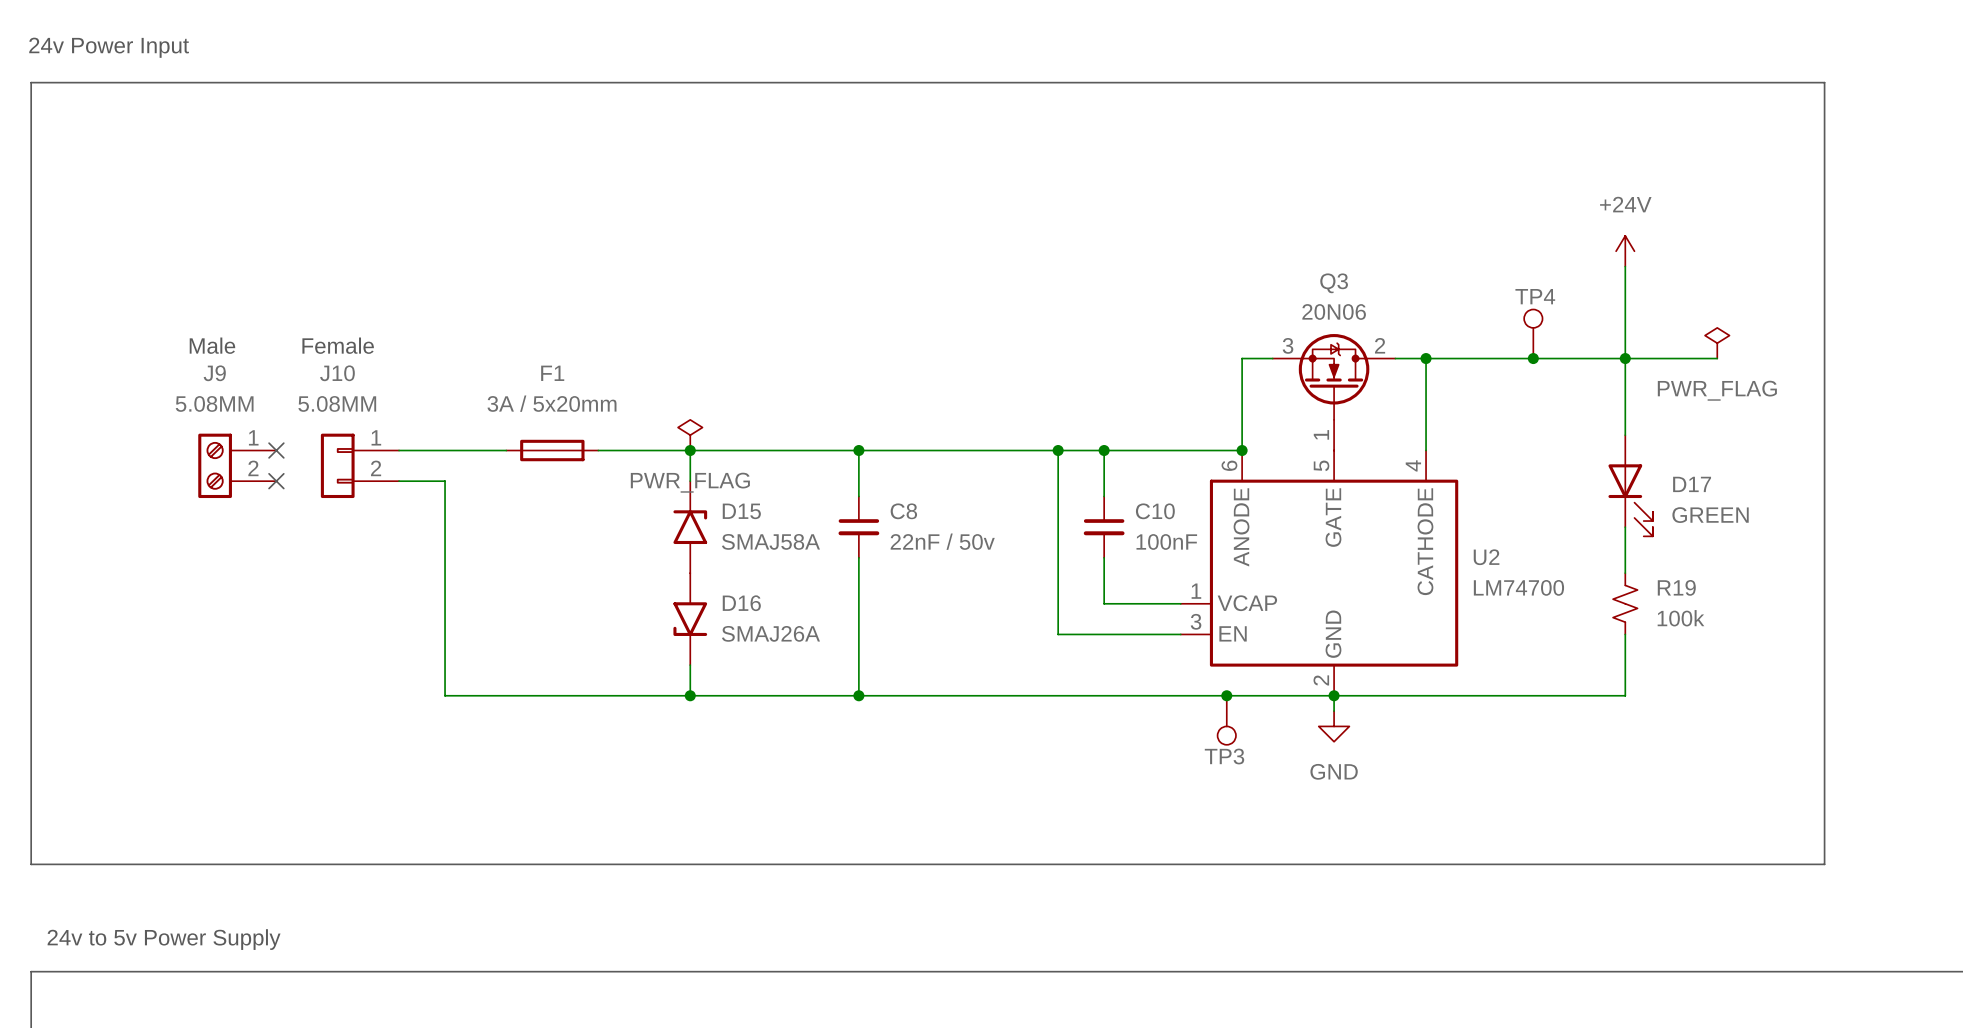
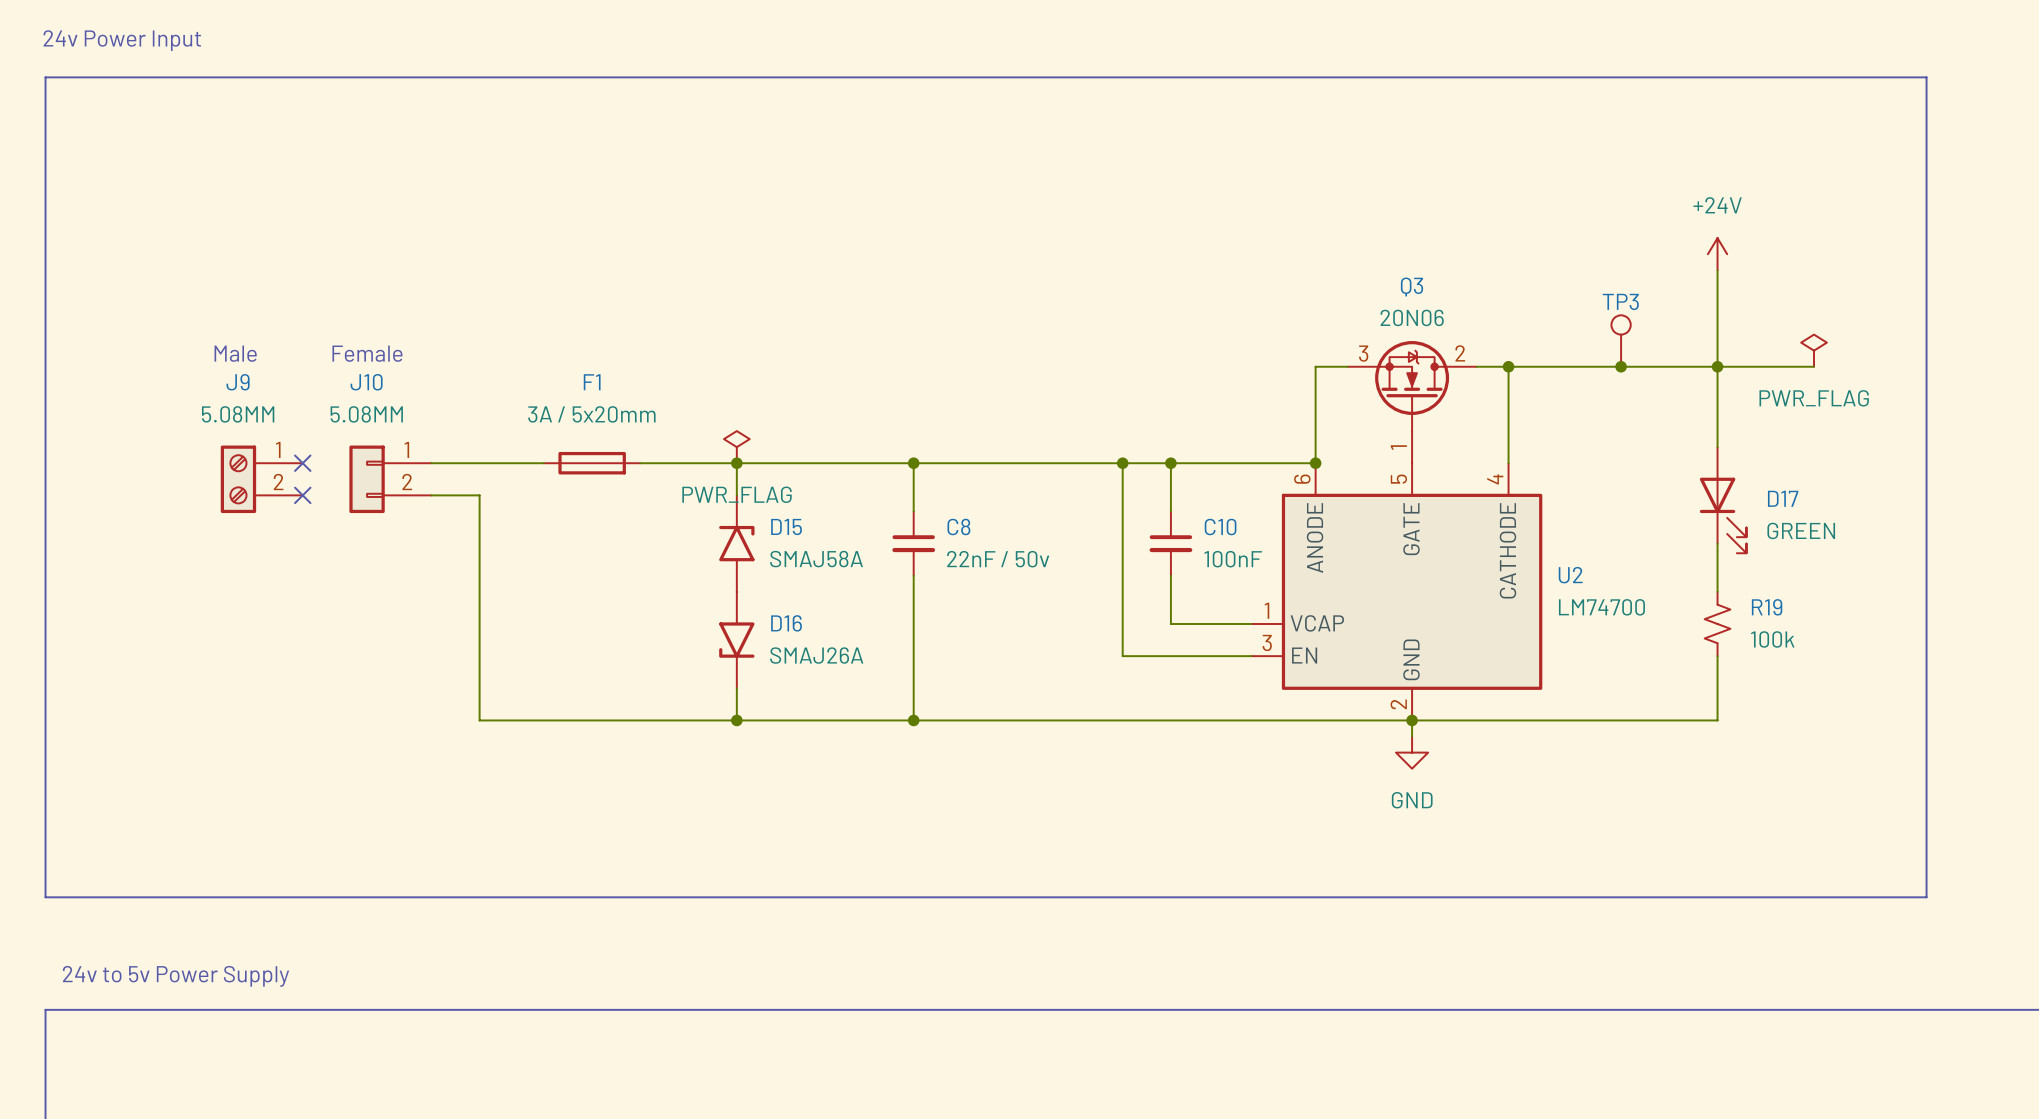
TP4 name: TP4 (1535, 296) -> TP3 (1620, 301)
junction: (1226, 695) -> none
TP3: (1226, 720) -> none

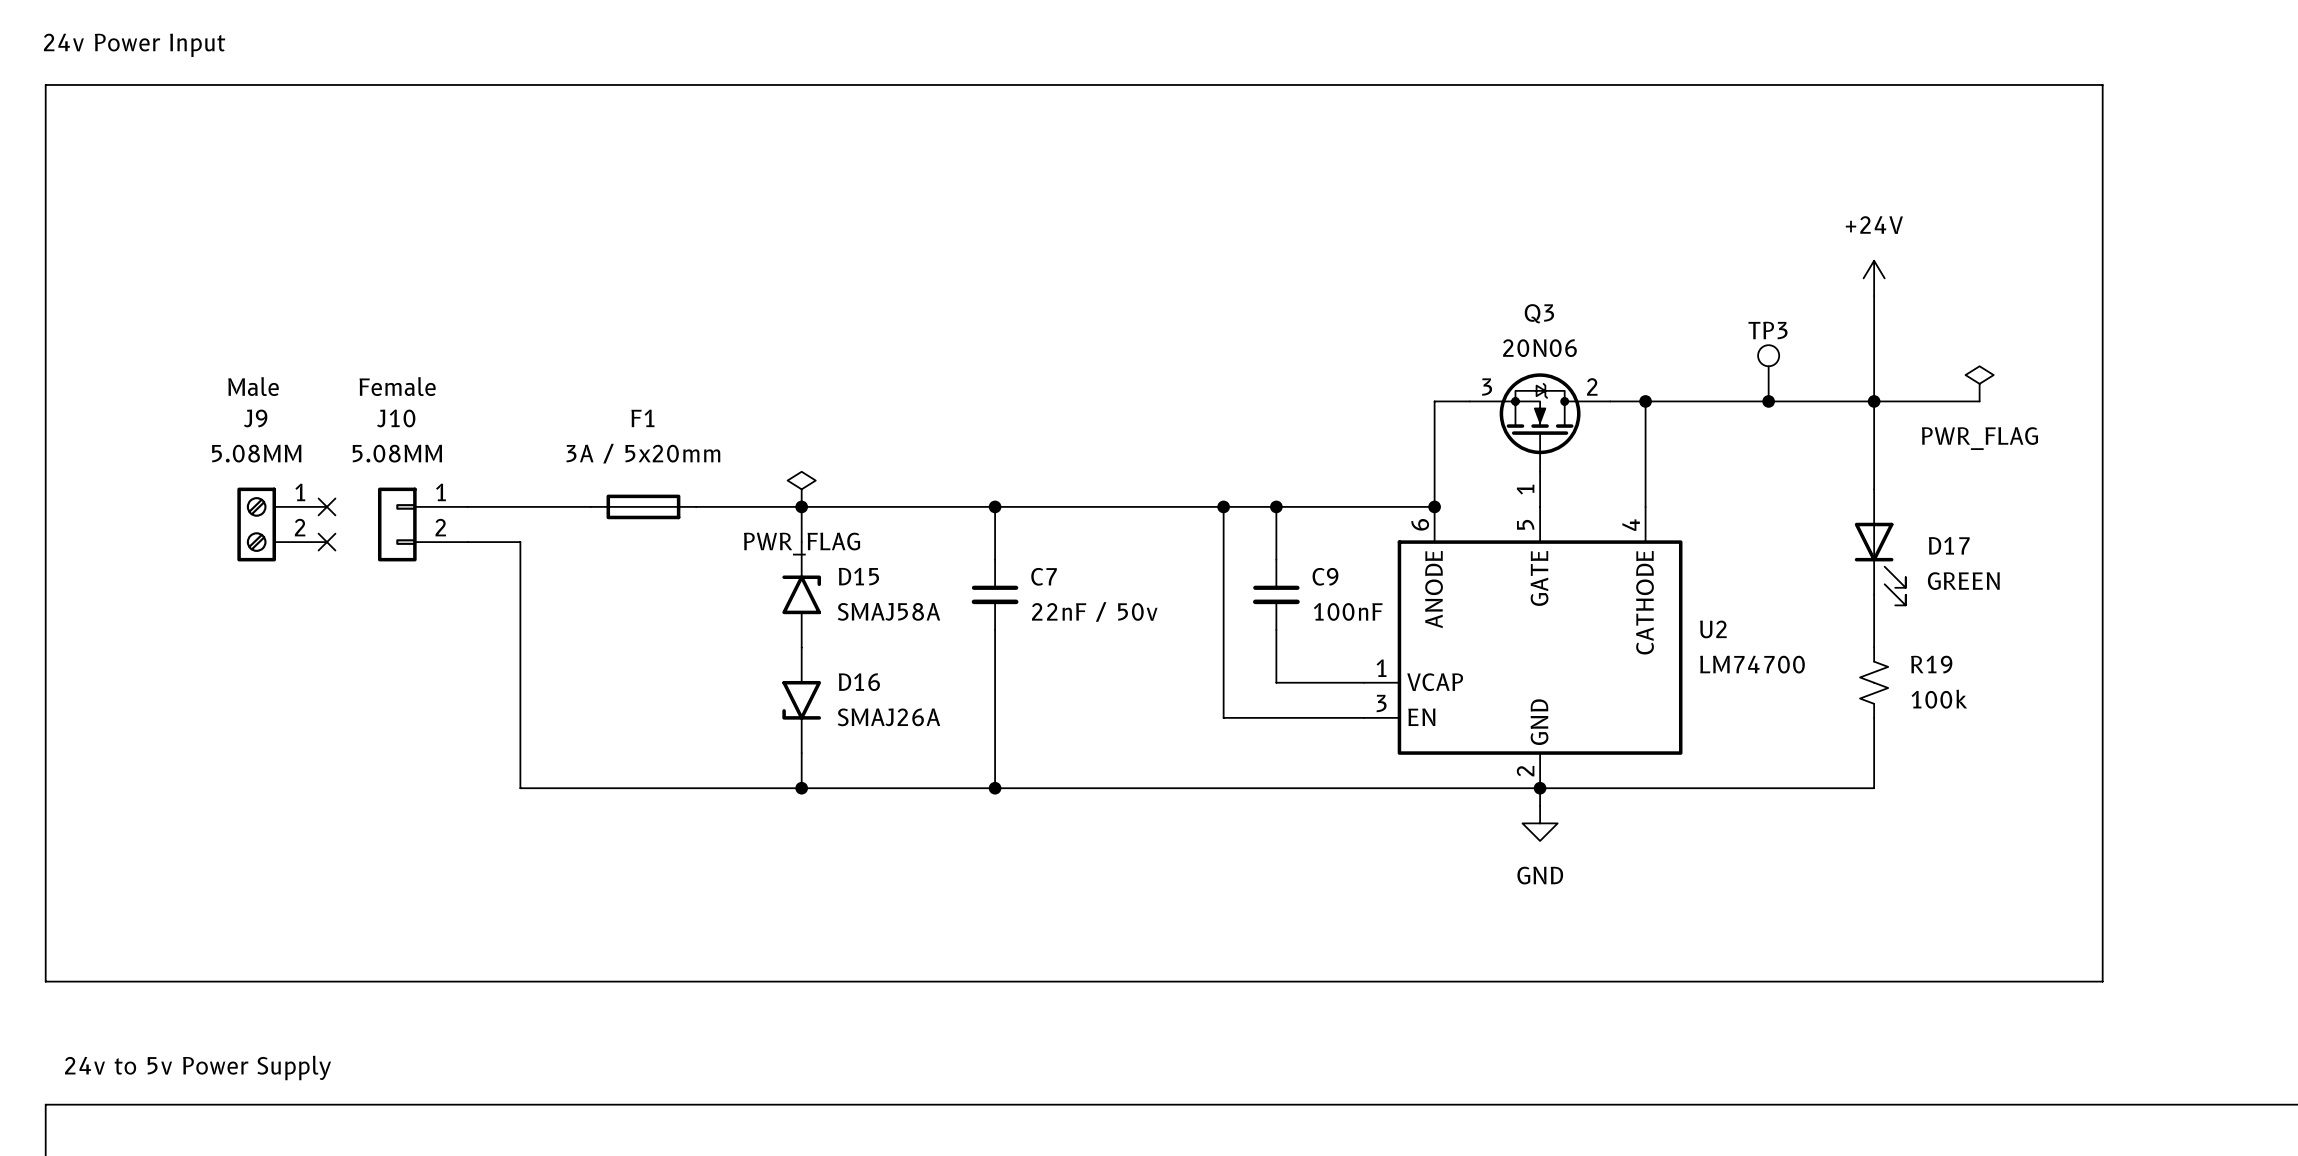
C8 name: C8 (958, 527) -> C7 (1044, 576)
C10 name: C10 (1220, 527) -> C9 (1325, 576)

